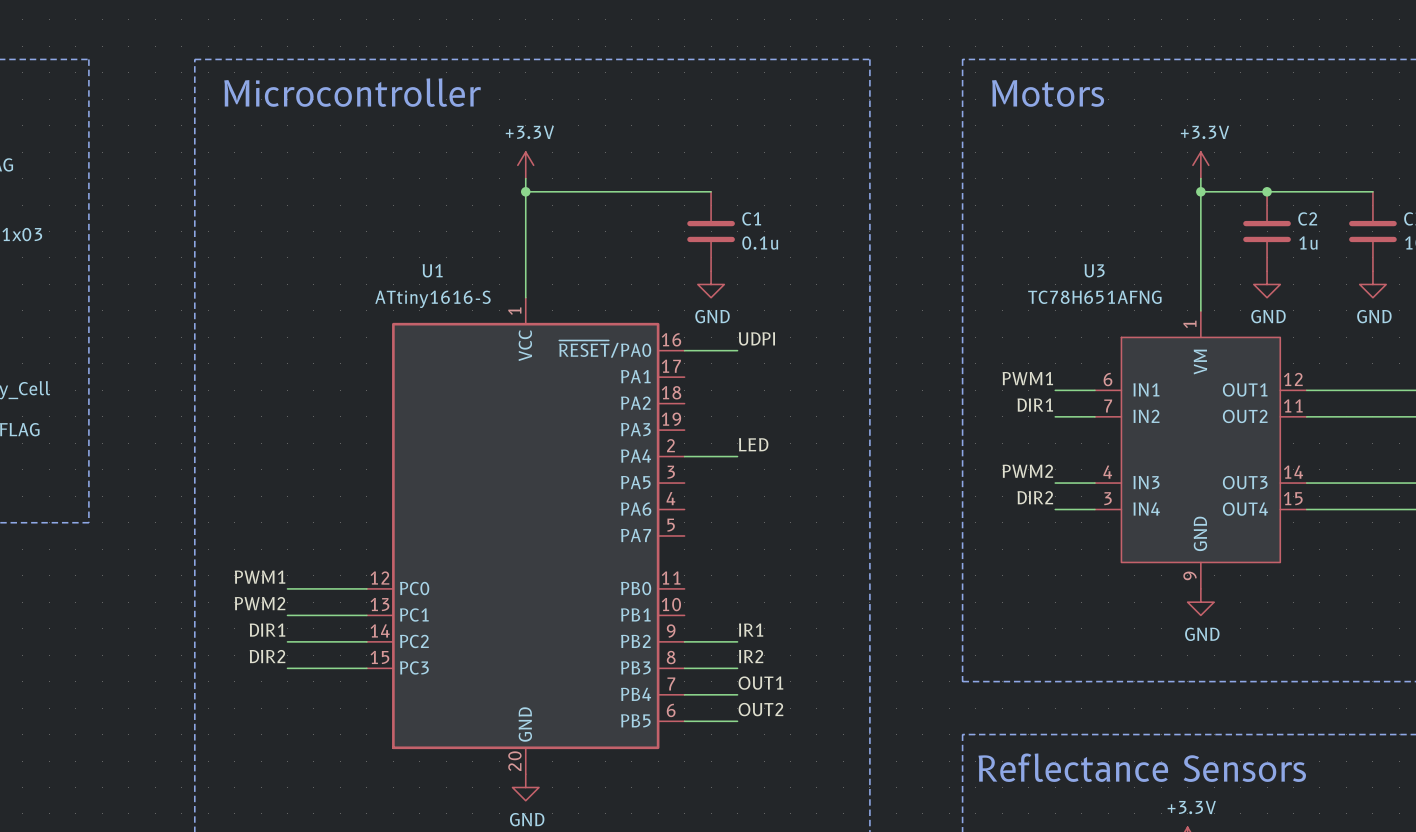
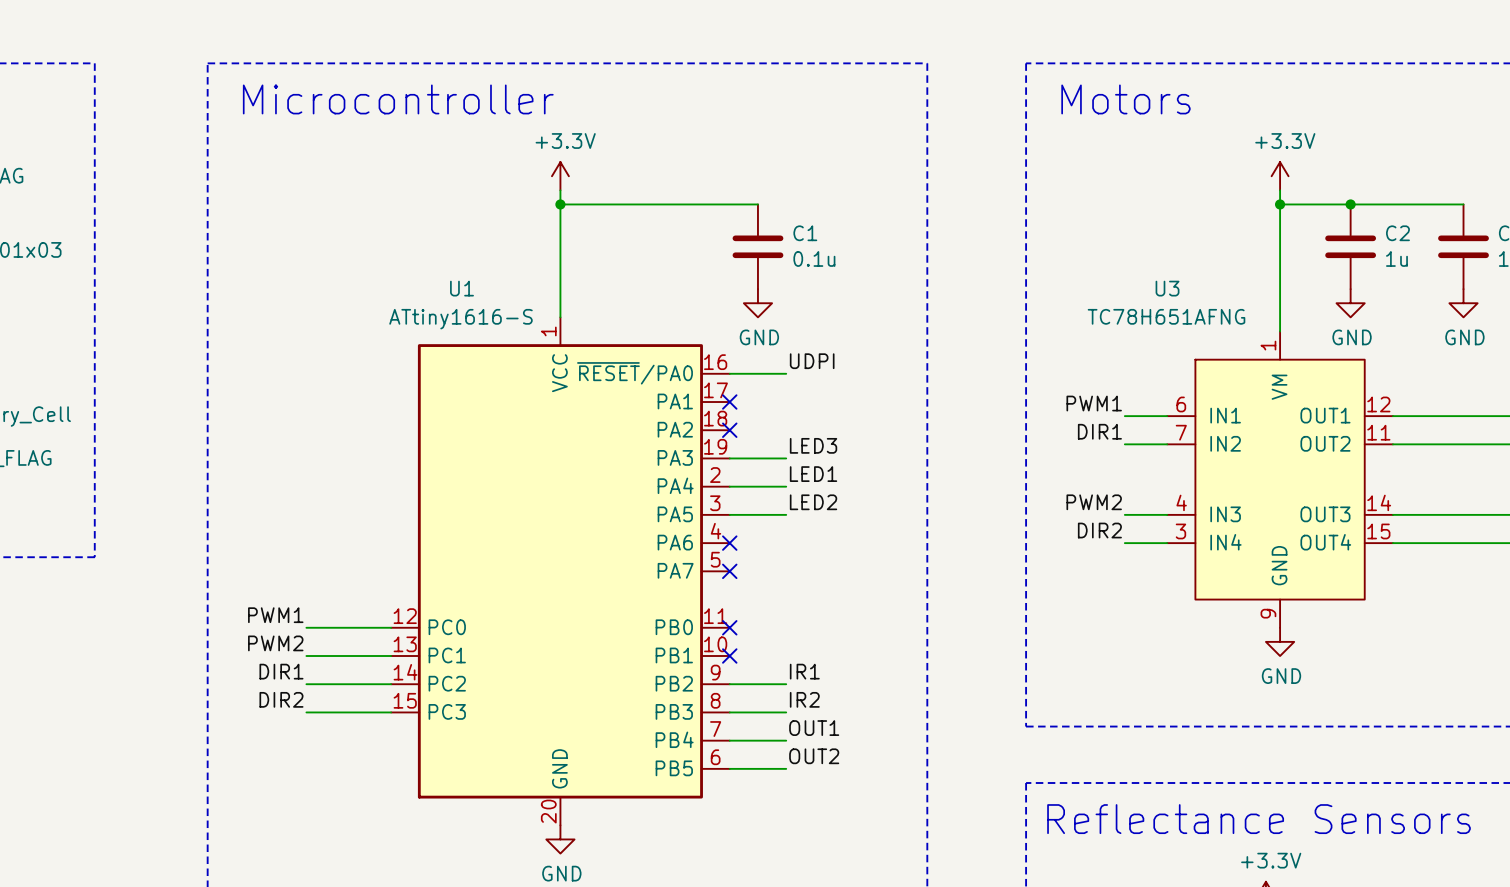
no-connect mark: none -> (729, 402)
no-connect mark: none -> (729, 430)
label: none -> LED3 (813, 445)
wire: none -> (729, 458) (786, 458)
label: LED (753, 444) -> LED1 (813, 474)
label: none -> LED2 (813, 502)
wire: none -> (729, 514) (786, 514)
no-connect mark: none -> (729, 543)
no-connect mark: none -> (729, 571)
no-connect mark: none -> (729, 627)
no-connect mark: none -> (729, 656)

